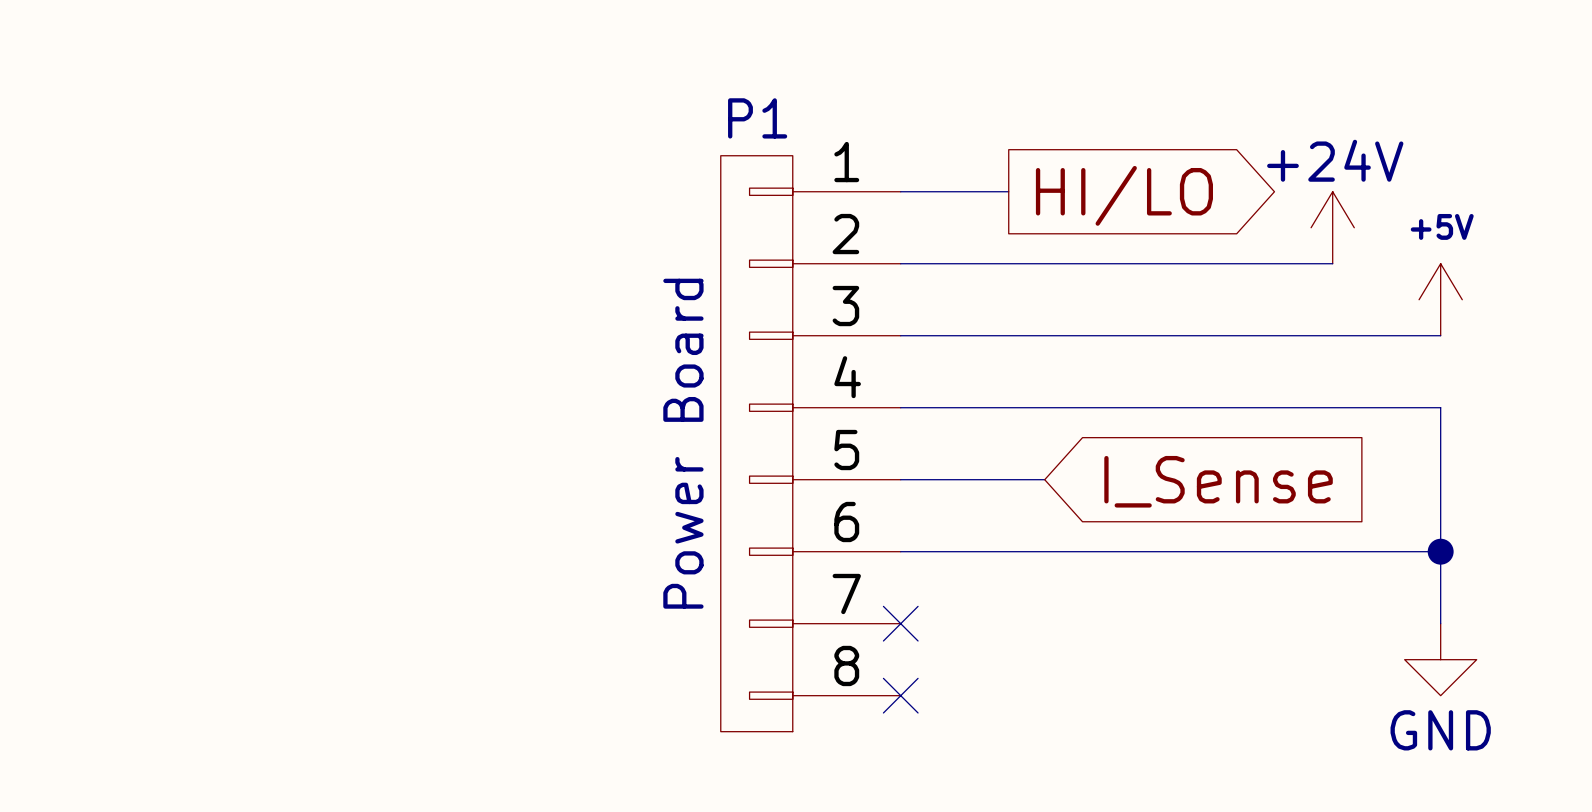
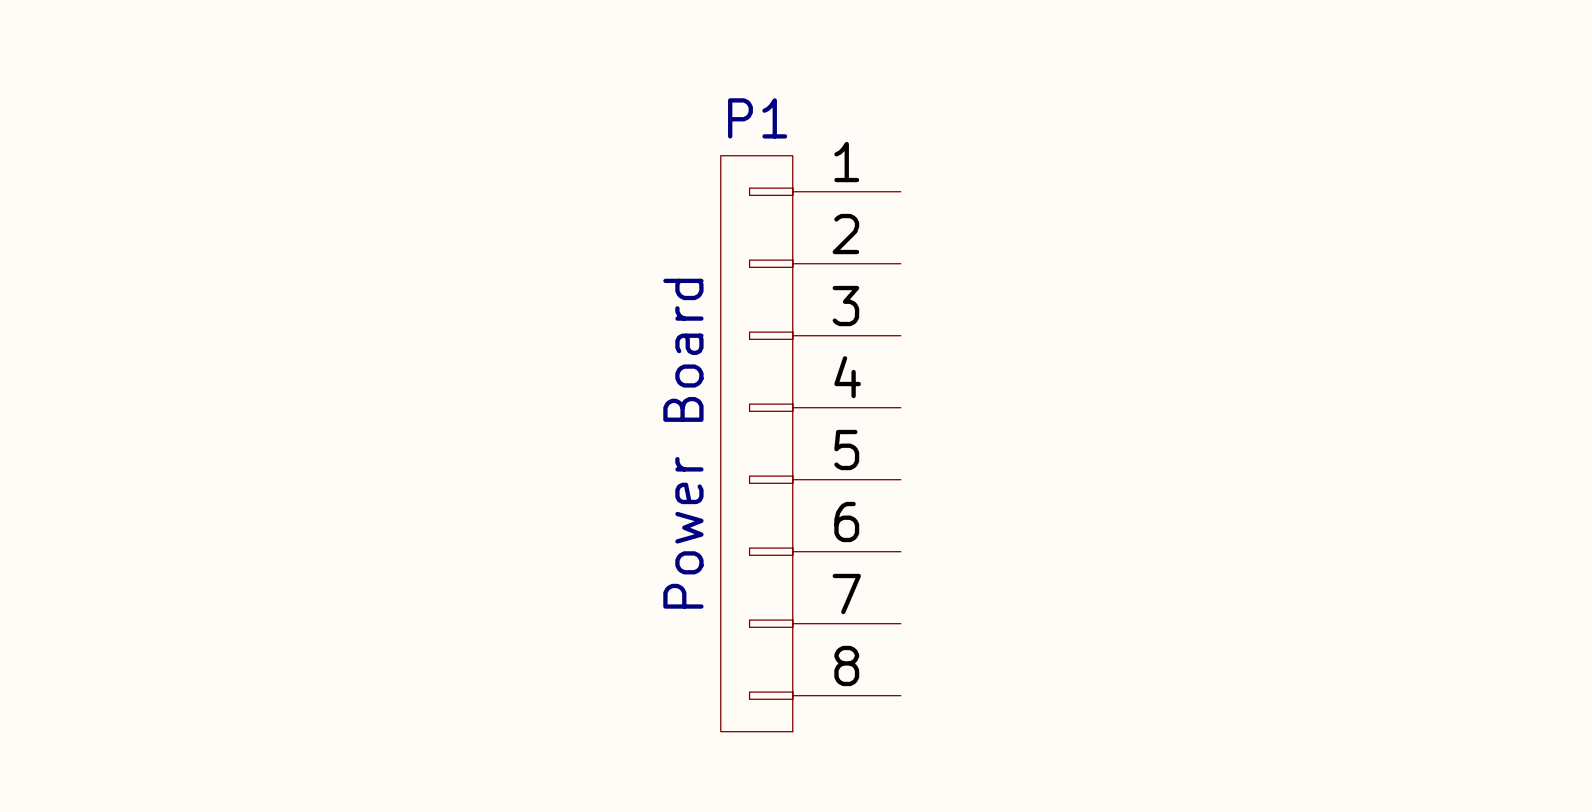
wire: (900, 191) (1008, 191) -> none
global label: HI/LO (1124, 195) -> none
power symbol: +24V (1332, 227) -> none
wire: (900, 263) (1332, 263) -> none
power symbol: +5V (1440, 299) -> none
wire: (900, 335) (1440, 335) -> none
wire: (900, 407) (1440, 407) (1440, 623) -> none
wire: (900, 479) (1044, 479) -> none
global label: I_Sense (1218, 481) -> none
wire: (900, 551) (1440, 551) -> none
junction: (1440, 551) -> none
no-connect mark: (900, 623) -> none
power symbol: GND (1440, 659) -> none
no-connect mark: (900, 695) -> none

